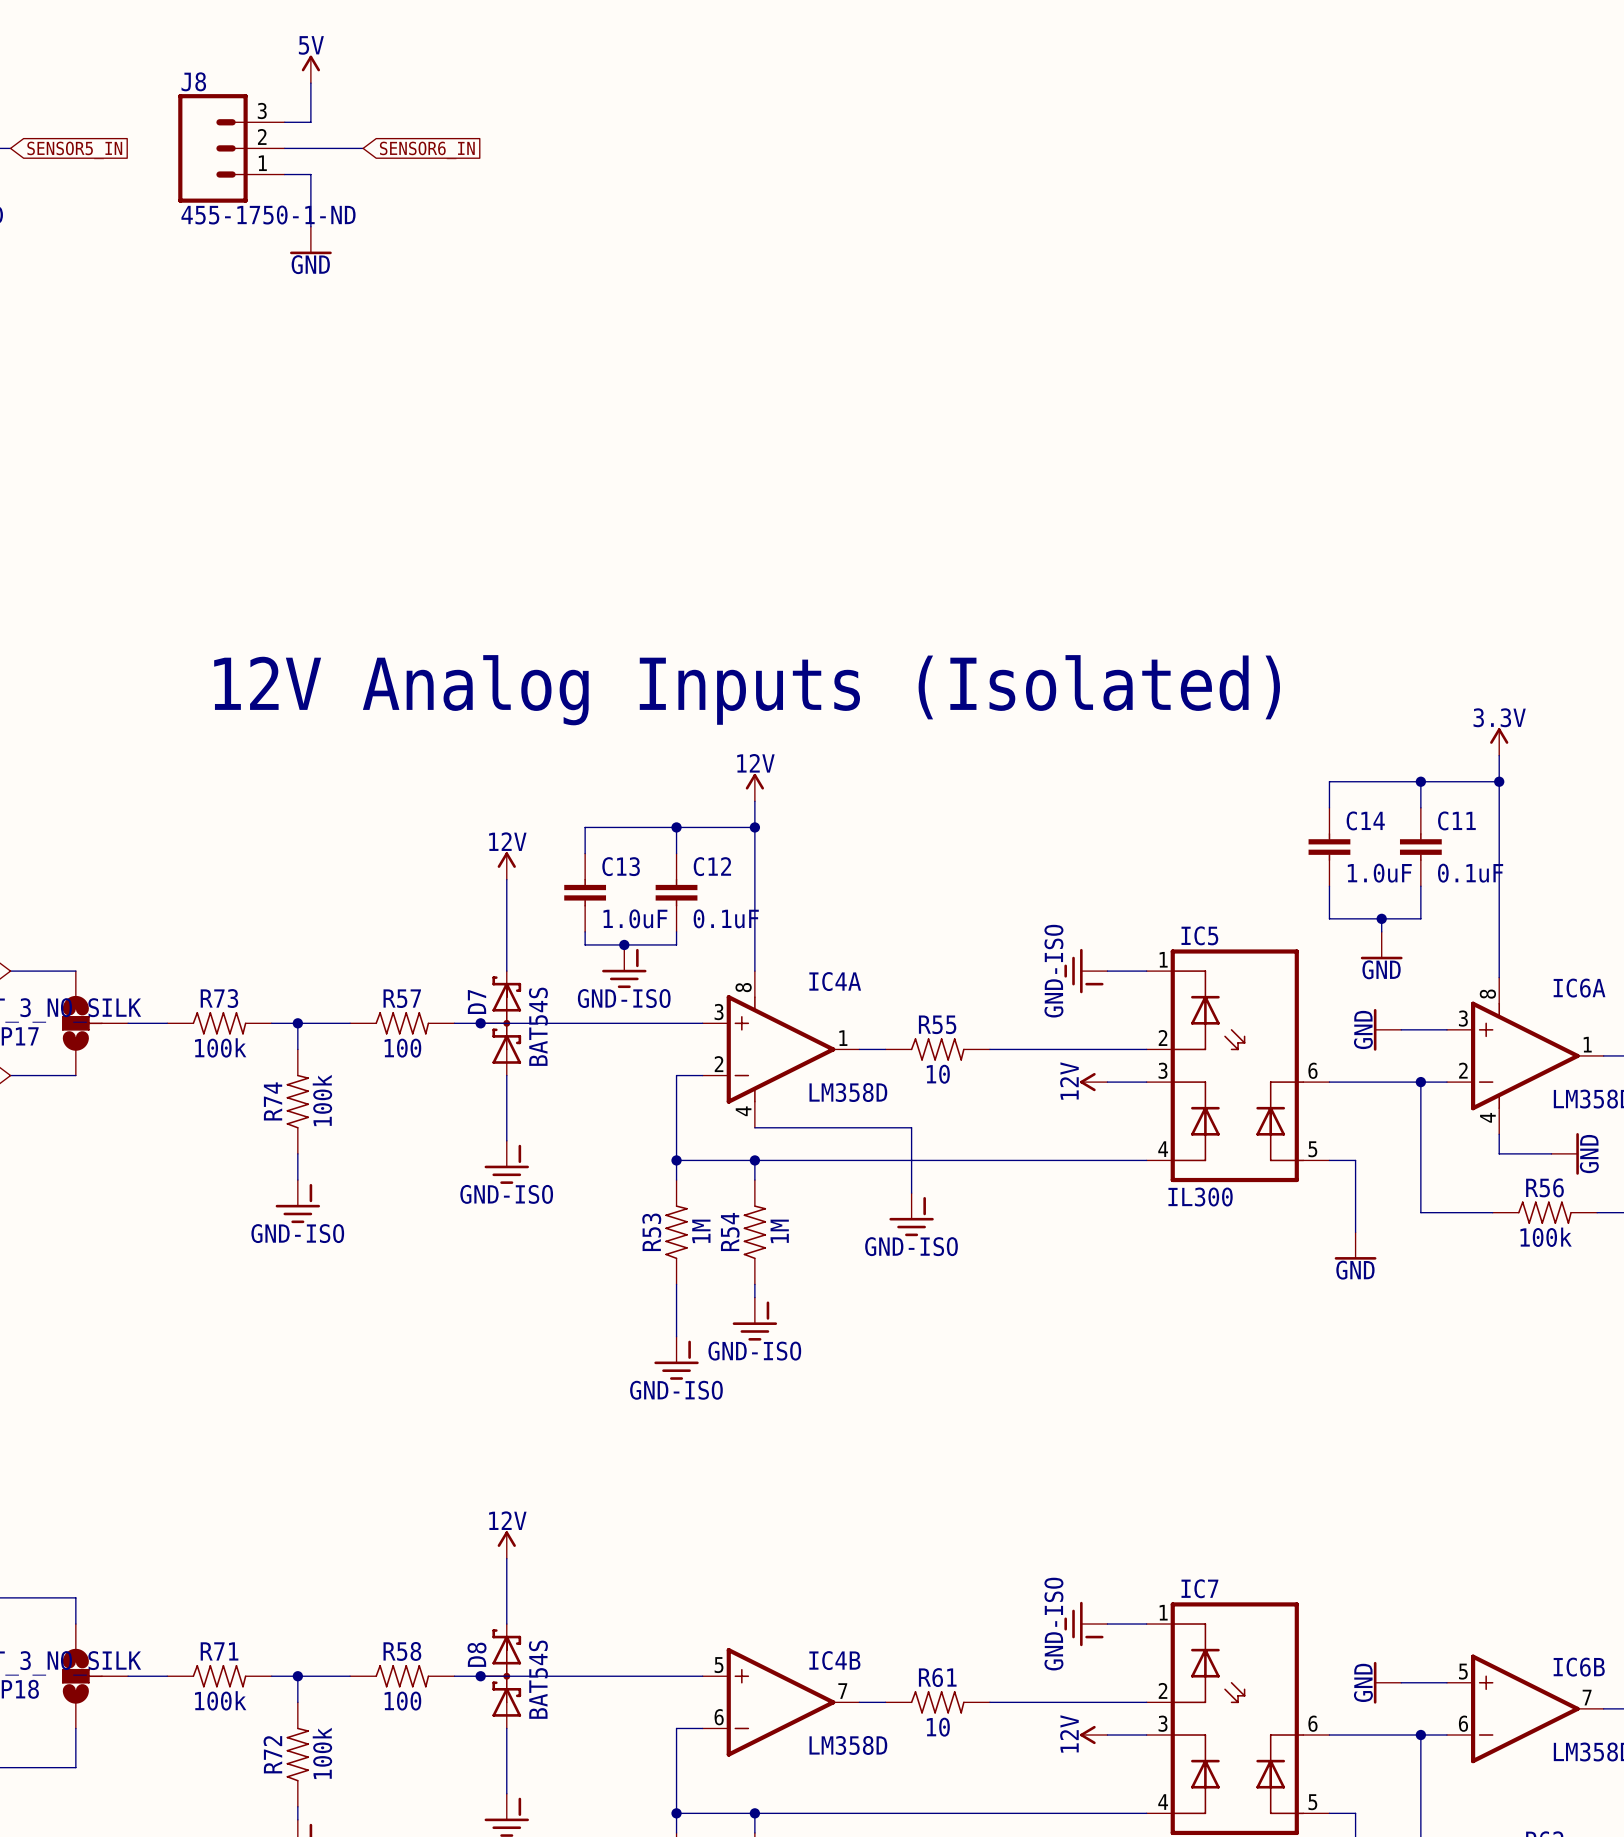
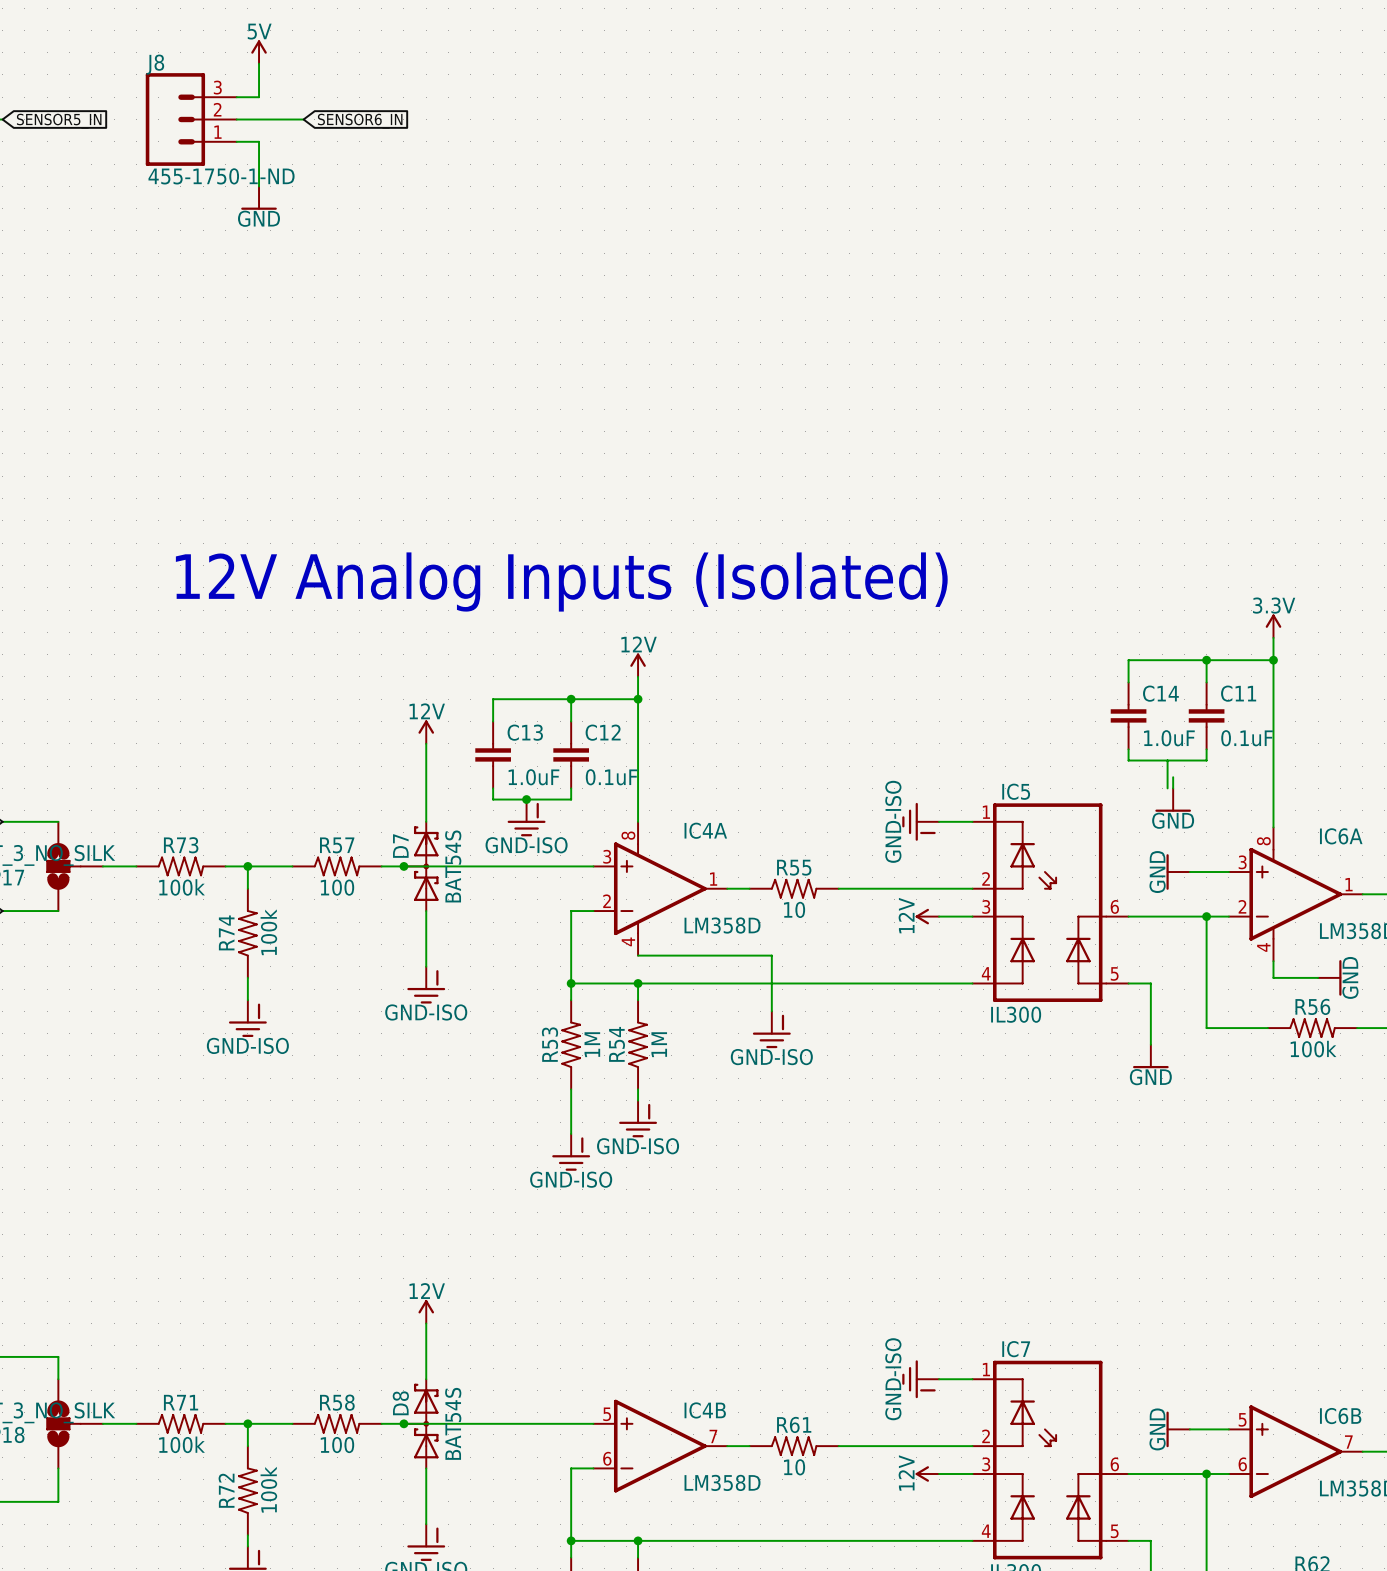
wire: (1329, 899) (1329, 918) (1420, 918) (1420, 899) -> (1128, 760) (1206, 760)
wire: none -> (1167, 760) (1167, 788)
junction: (1381, 918) -> none

